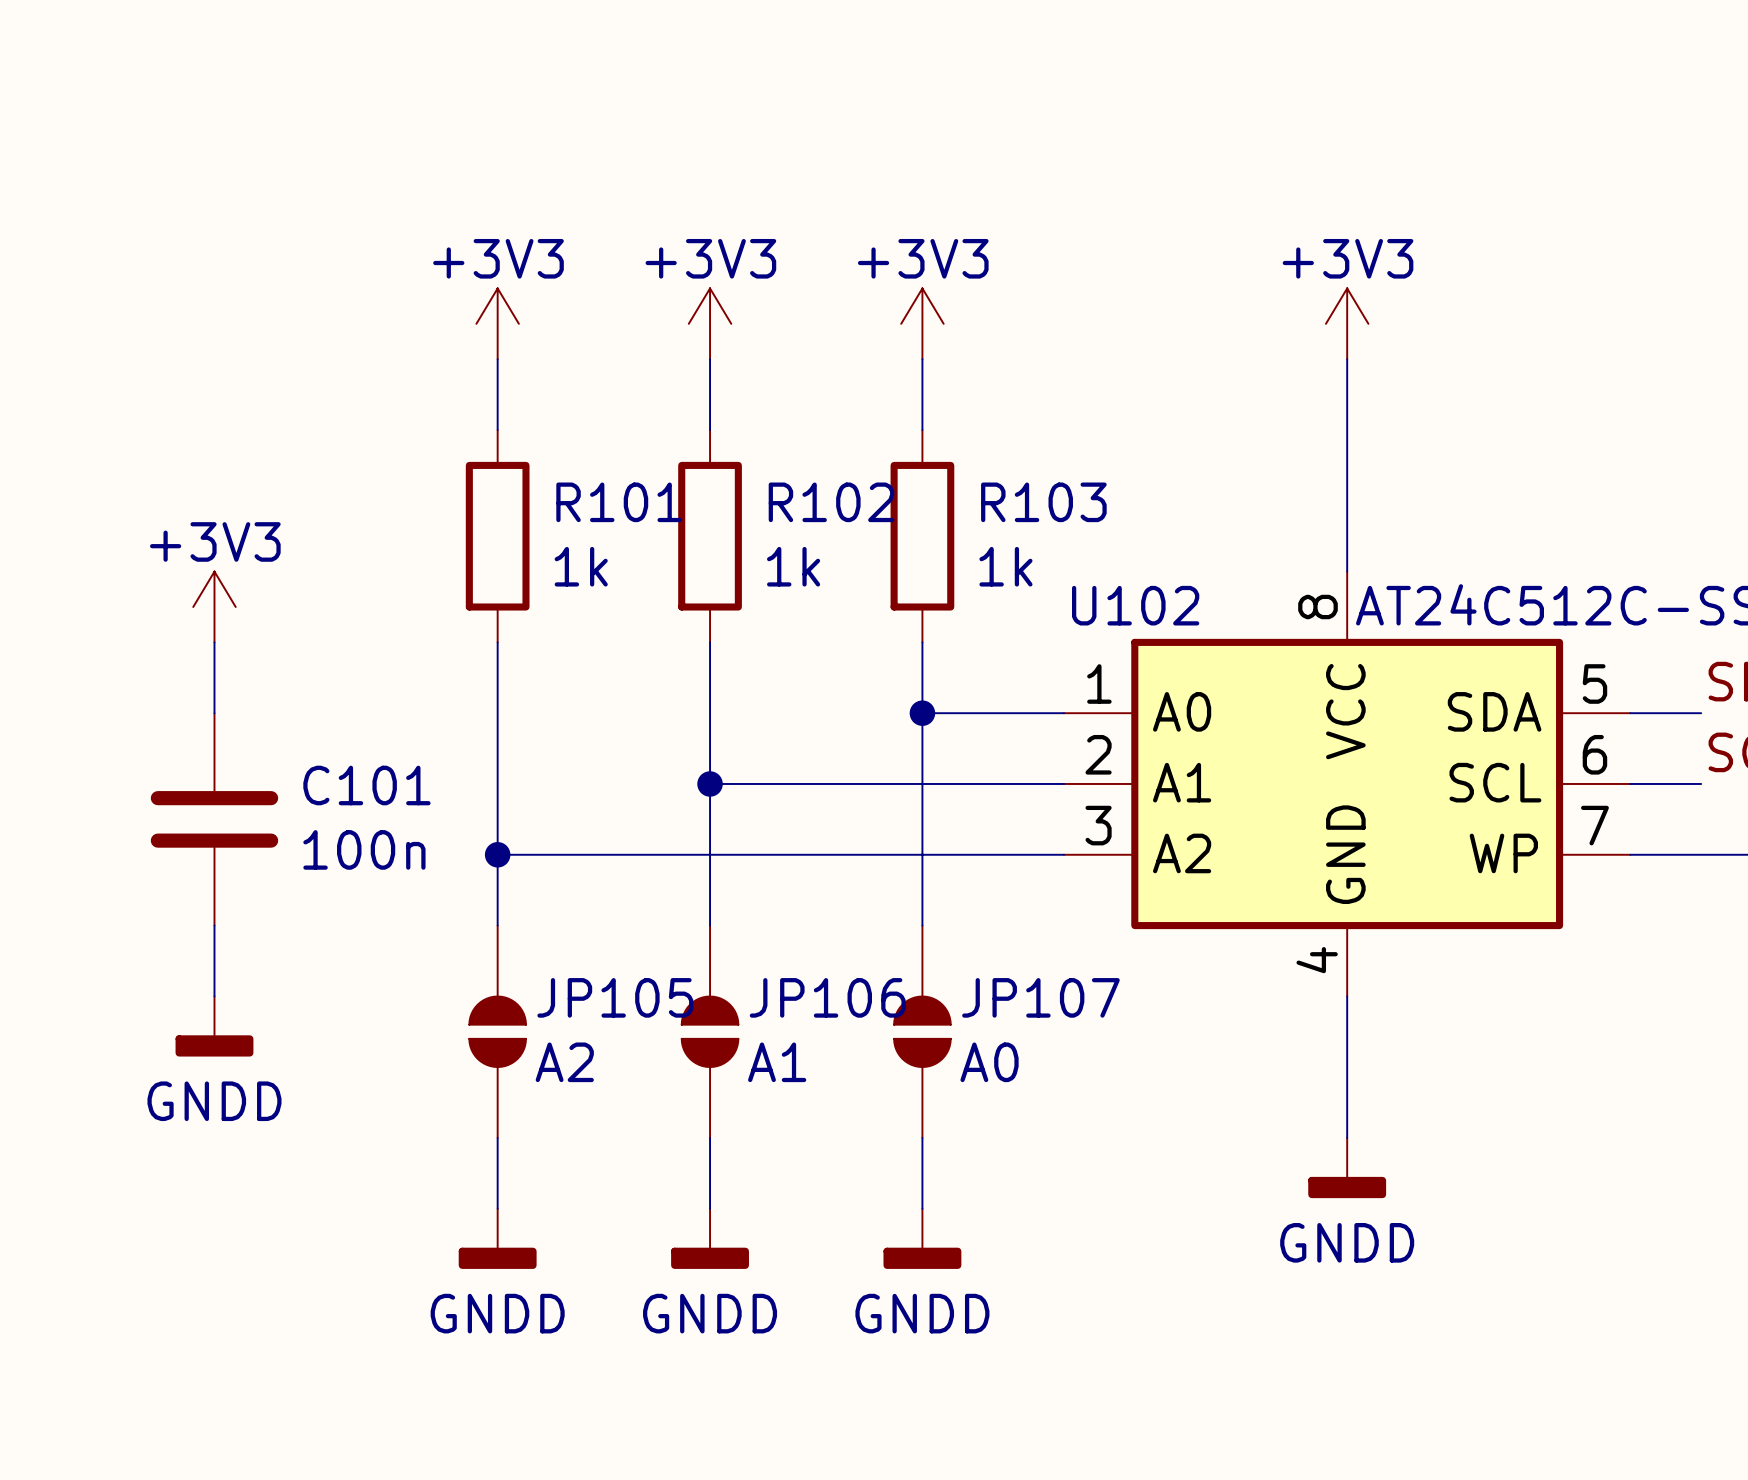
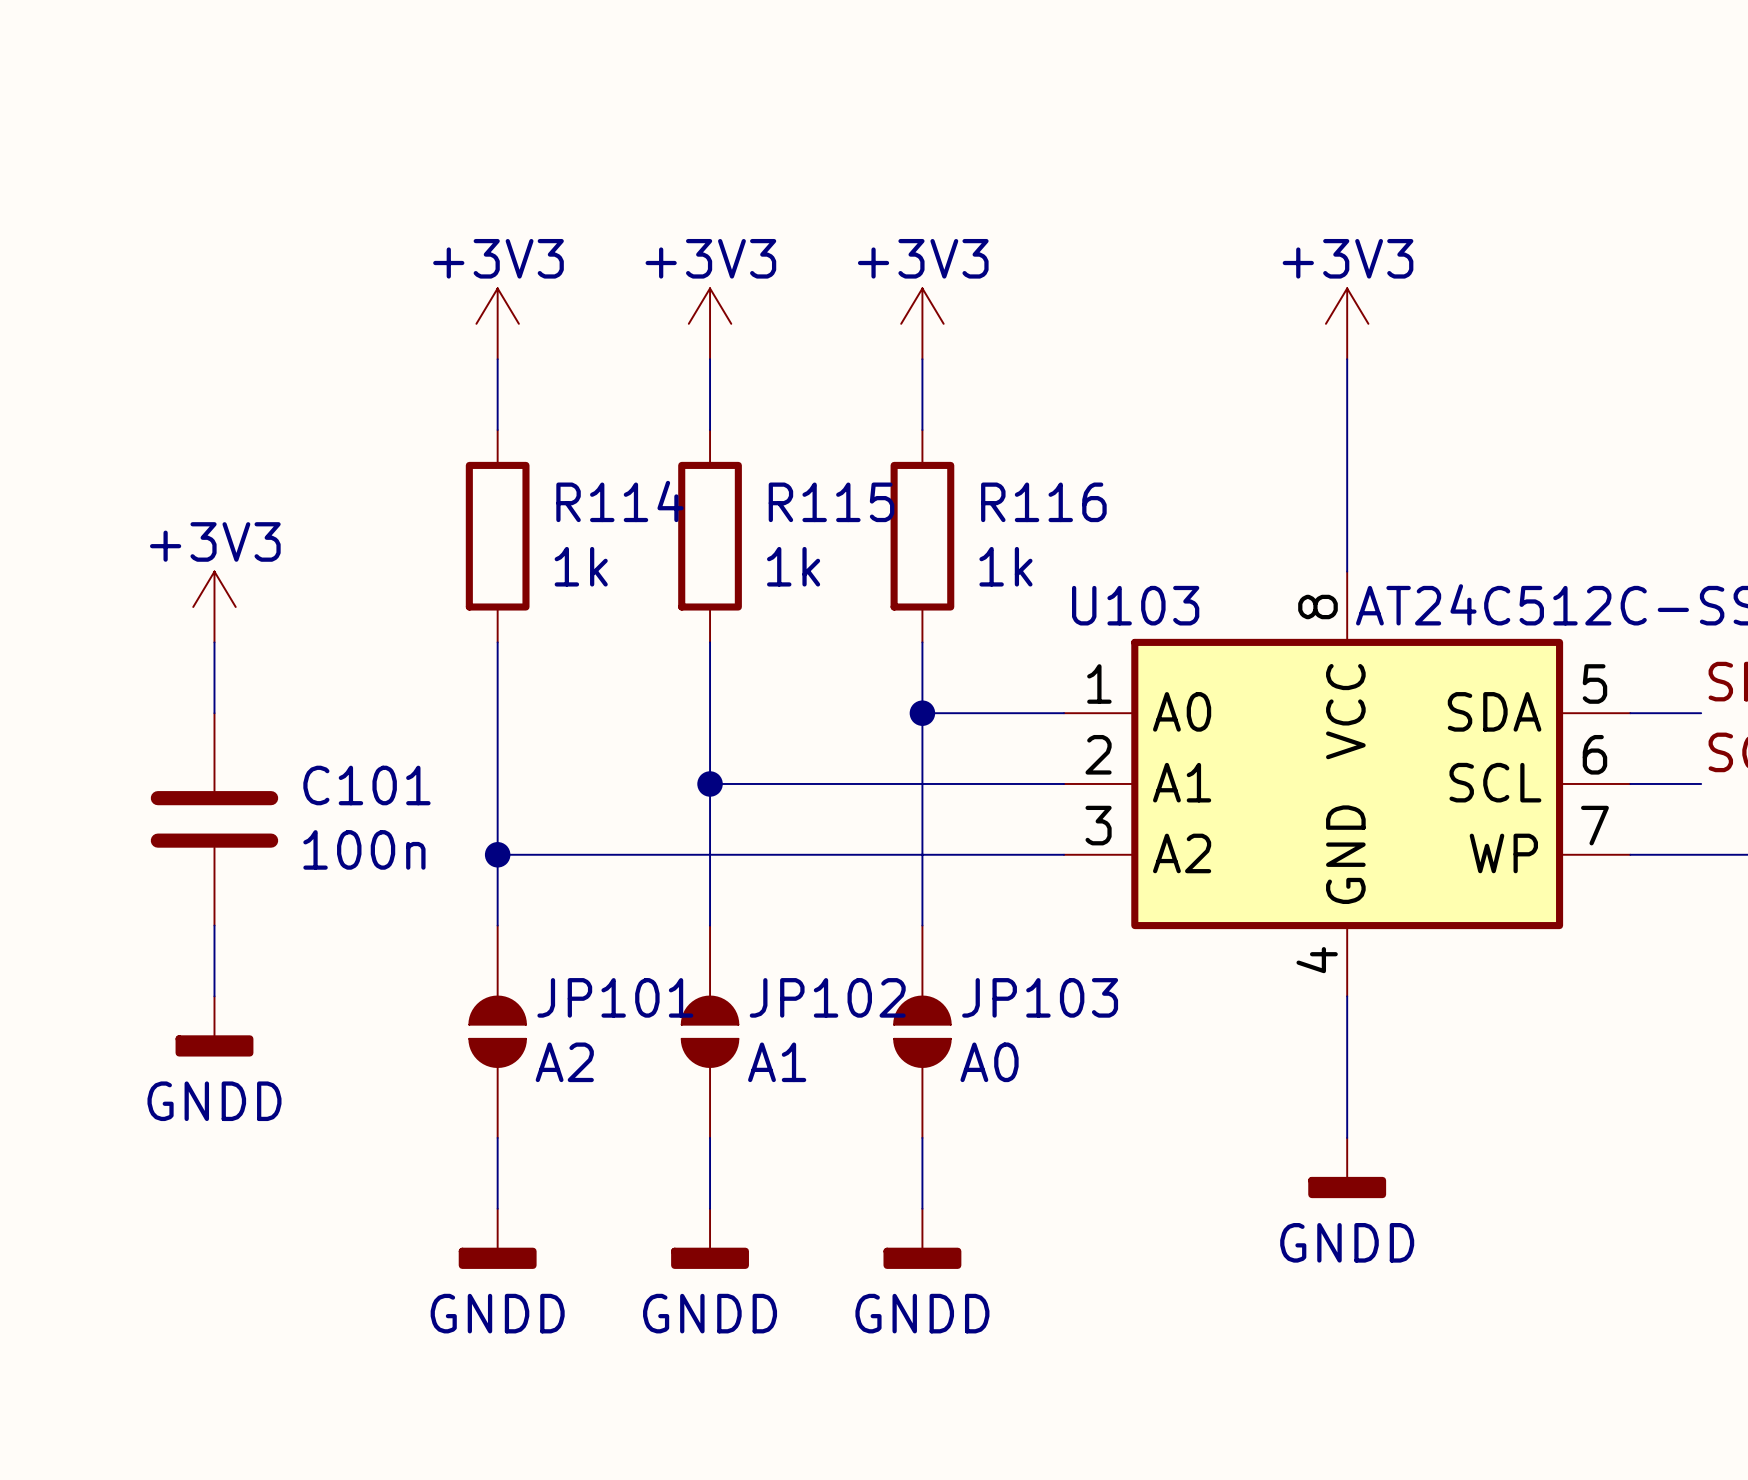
R101 name: R101 (619, 502) -> R114 (619, 501)
R102 name: R102 (831, 502) -> R115 (831, 502)
R103 name: R103 (1043, 502) -> R116 (1043, 502)
U102 name: U102 (1135, 605) -> U103 (1135, 605)
JP105 name: JP105 (615, 997) -> JP101 (615, 997)
JP106 name: JP106 (827, 997) -> JP102 (827, 997)
JP107 name: JP107 (1040, 997) -> JP103 (1040, 997)

